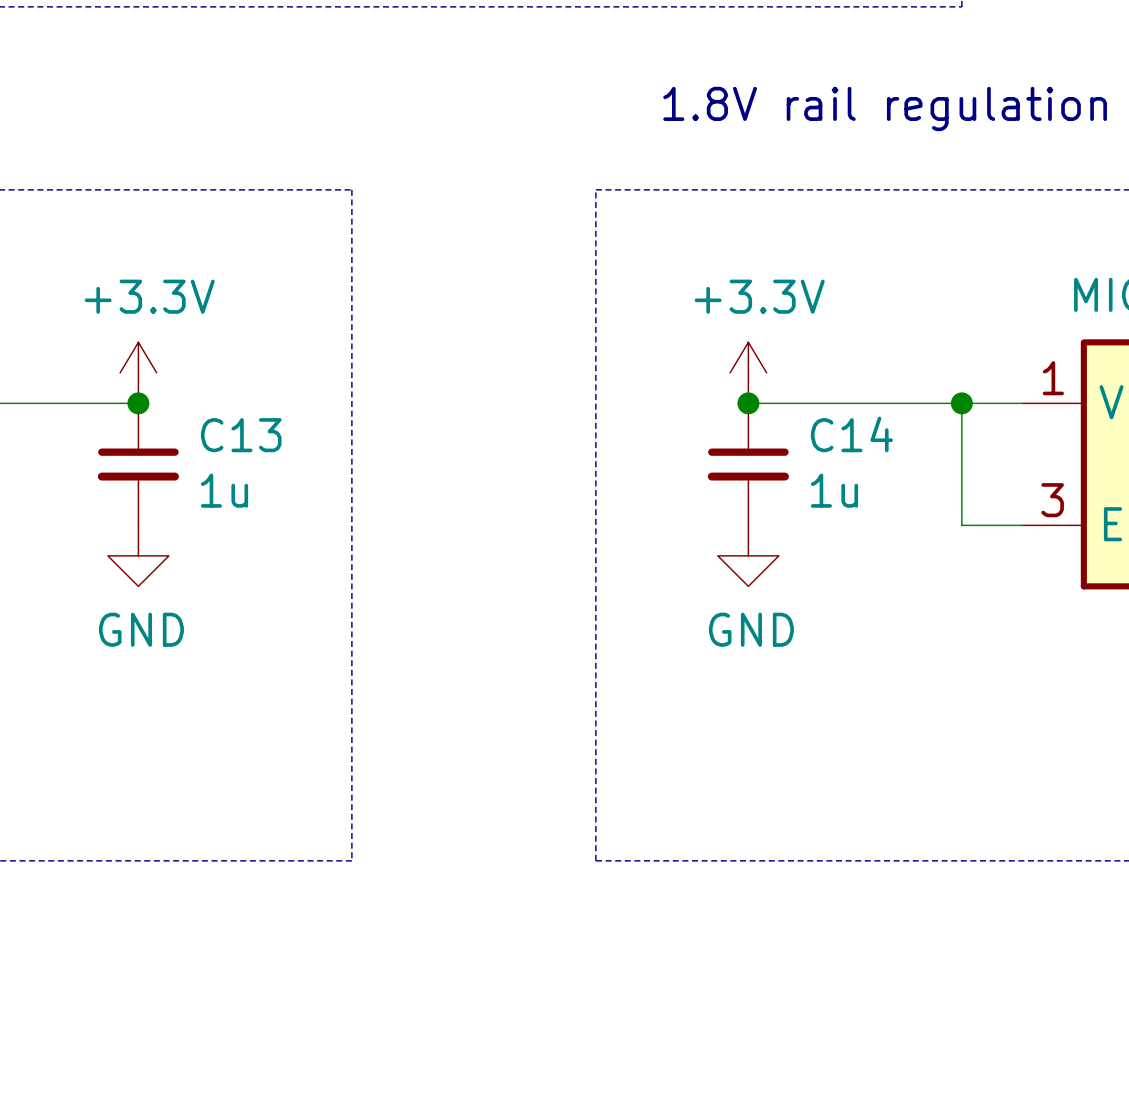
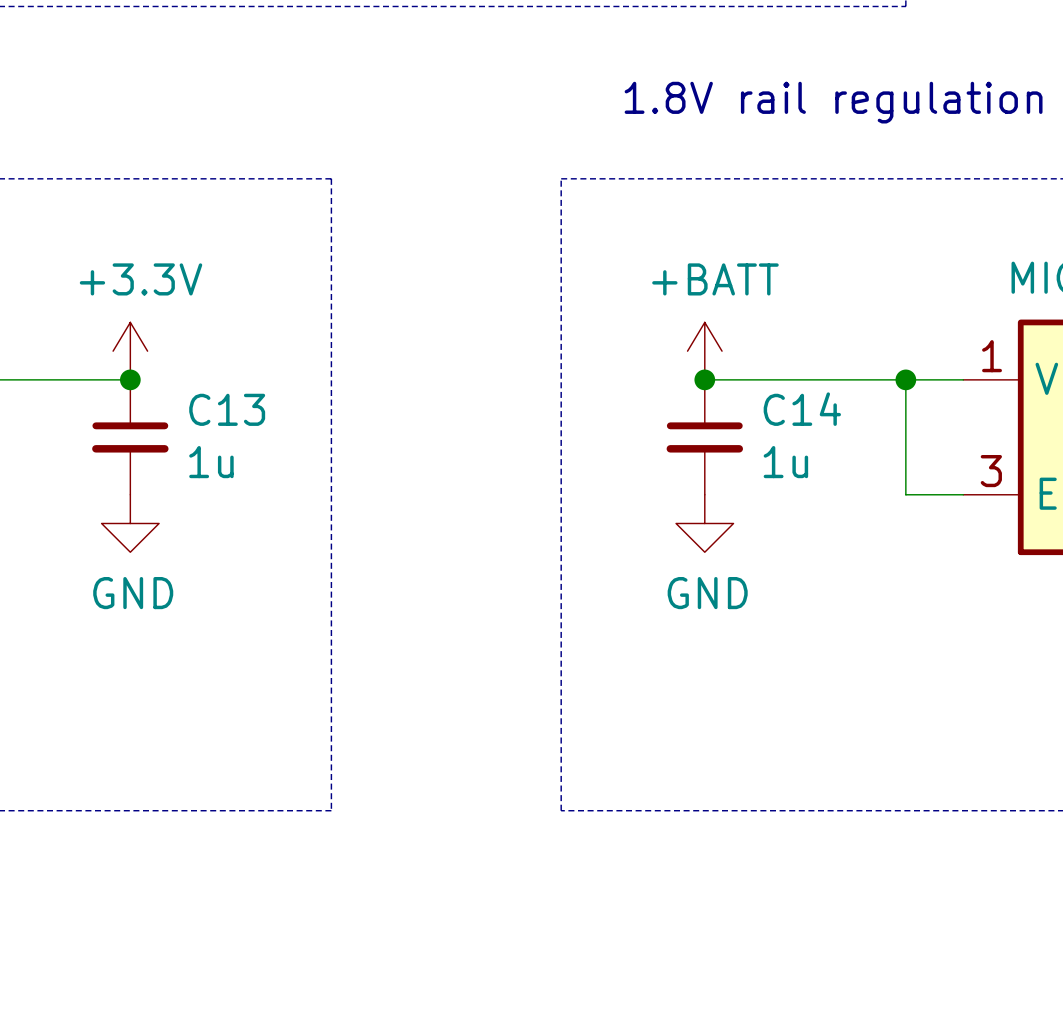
power symbol: +3.3V (748, 372) -> +BATT (704, 351)

